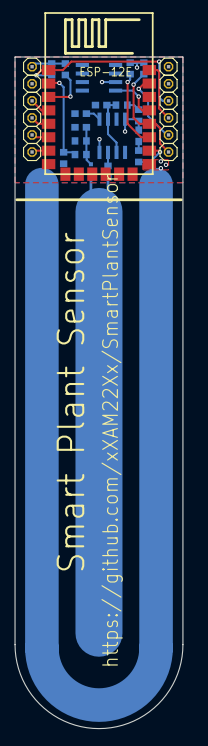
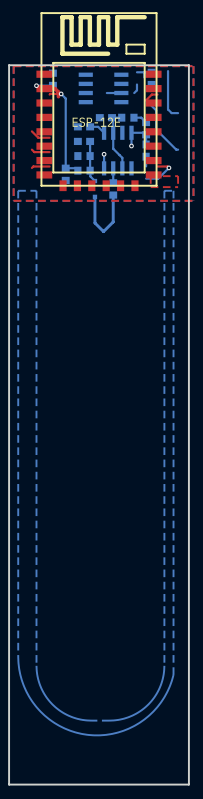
board edge: (15, 56) (182, 56) (182, 650) (177, 673) (162, 699) (139, 718) (110, 727) (92, 728) (75, 725) (48, 711) (28, 690) (20, 673) (15, 656) (15, 56) -> (9, 65) (9, 784) (188, 784) (188, 65) (9, 65)
top track: (159, 61) (71, 61) (62, 70) (41, 70) (36, 75) -> none
via: (159, 61) -> none
bottom track: (65, 63) (35, 63) (32, 66) -> none
part: (32, 66) -> none
part: (168, 66) -> none
via: (136, 67) -> none
part: (130, 68) -> none
part: (65, 69) -> none
top track: (149, 70) (159, 71) (159, 108) (168, 117) -> none
bottom track: (65, 74) (70, 80) (70, 96) -> none
bottom track: (143, 74) (133, 84) -> none
top track: none -> (44, 88) (54, 88) (58, 92) (58, 96)
via: (102, 82) -> none
top track: (127, 82) (127, 123) (141, 137) (149, 137) -> none
via: (127, 82) -> none
part: (32, 83) -> none
part: (168, 83) -> none
top track: (133, 84) (133, 117) (139, 123) (155, 123) (160, 128) (160, 143) (168, 152) -> none
via: (133, 84) -> none
via: (138, 88) -> none
part: none -> (99, 101)
bottom track: (115, 90) (132, 90) (138, 96) -> none
top track: (70, 96) (48, 96) -> none
via: (70, 96) -> none
ESP-12E: (98, 96) -> none
top track: (138, 96) (138, 106) (142, 110) (149, 110) -> none
via: (138, 96) -> none
top track: (32, 100) (41, 110) (48, 110) -> none
part: (32, 100) -> none
part: (168, 100) -> none
part: (32, 117) -> none
part: (168, 117) -> none
part: (32, 134) -> none
part: (168, 134) -> none
part: (32, 152) -> none
part: (168, 152) -> none
part: (138, 156) -> none
via: (160, 161) -> none
via: (165, 164) -> none
bottom track: (160, 168) (156, 173) (155, 652) (150, 672) (139, 688) (123, 699) (103, 704) (84, 703) (62, 691) (47, 672) (42, 652) (41, 184) -> none
via: (160, 168) -> none
bottom zone outline: none -> (18, 190) (19, 668) (29, 696) (49, 719) (75, 732) (93, 735) (111, 734) (134, 725) (149, 715) (164, 697) (173, 674) (173, 190) (164, 190) (164, 670) (159, 688) (148, 704) (132, 715) (109, 720) (81, 719) (63, 713) (46, 697) (37, 675) (36, 190) (18, 190)
line: (16, 199) (181, 199) -> none
bottom track: (98, 211) (98, 633) -> none
text: Smart Plant Sensor (70, 401) -> none
text: https://github.com/xXAM22Xx/SmartPlantSensor (112, 420) -> none

